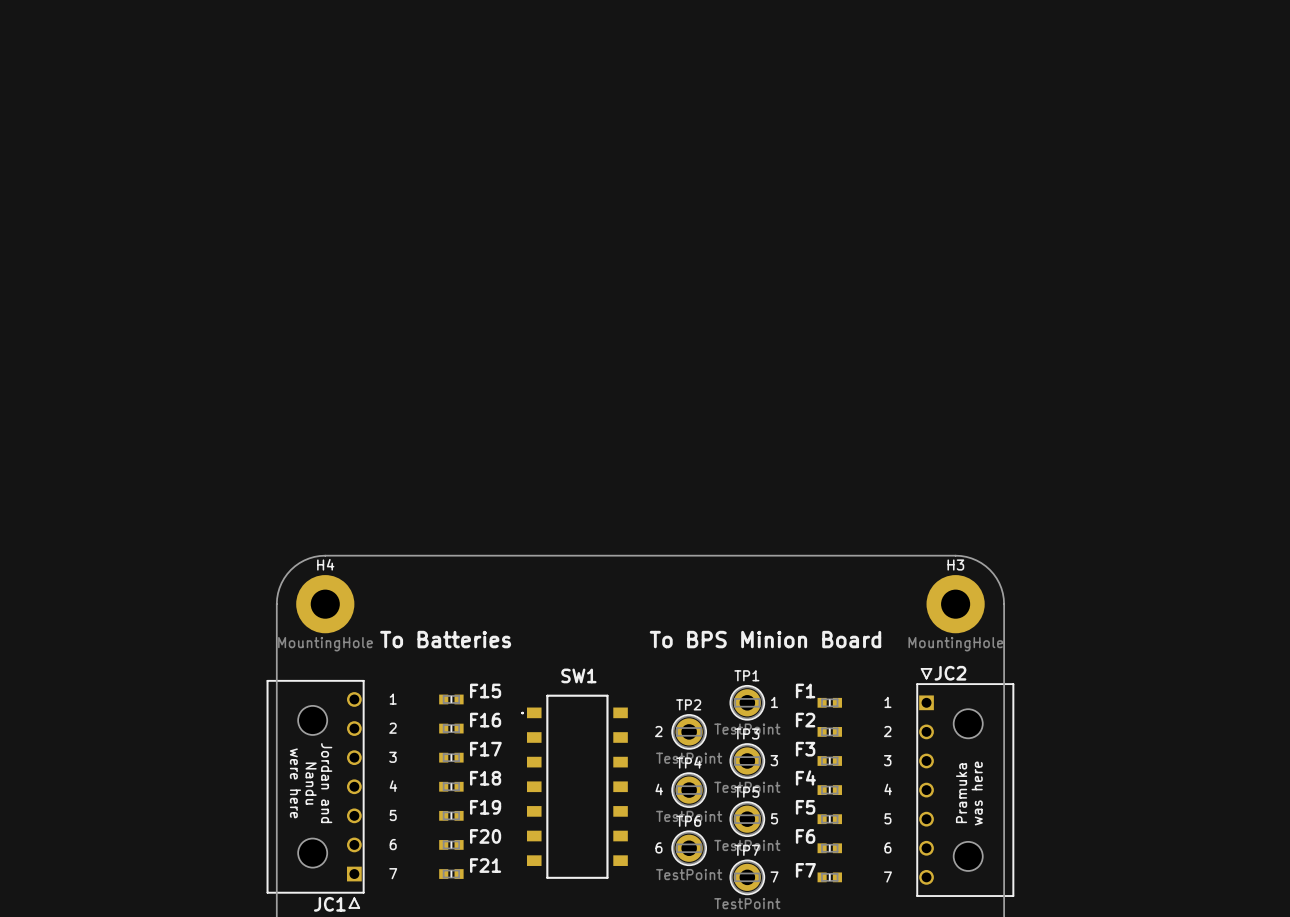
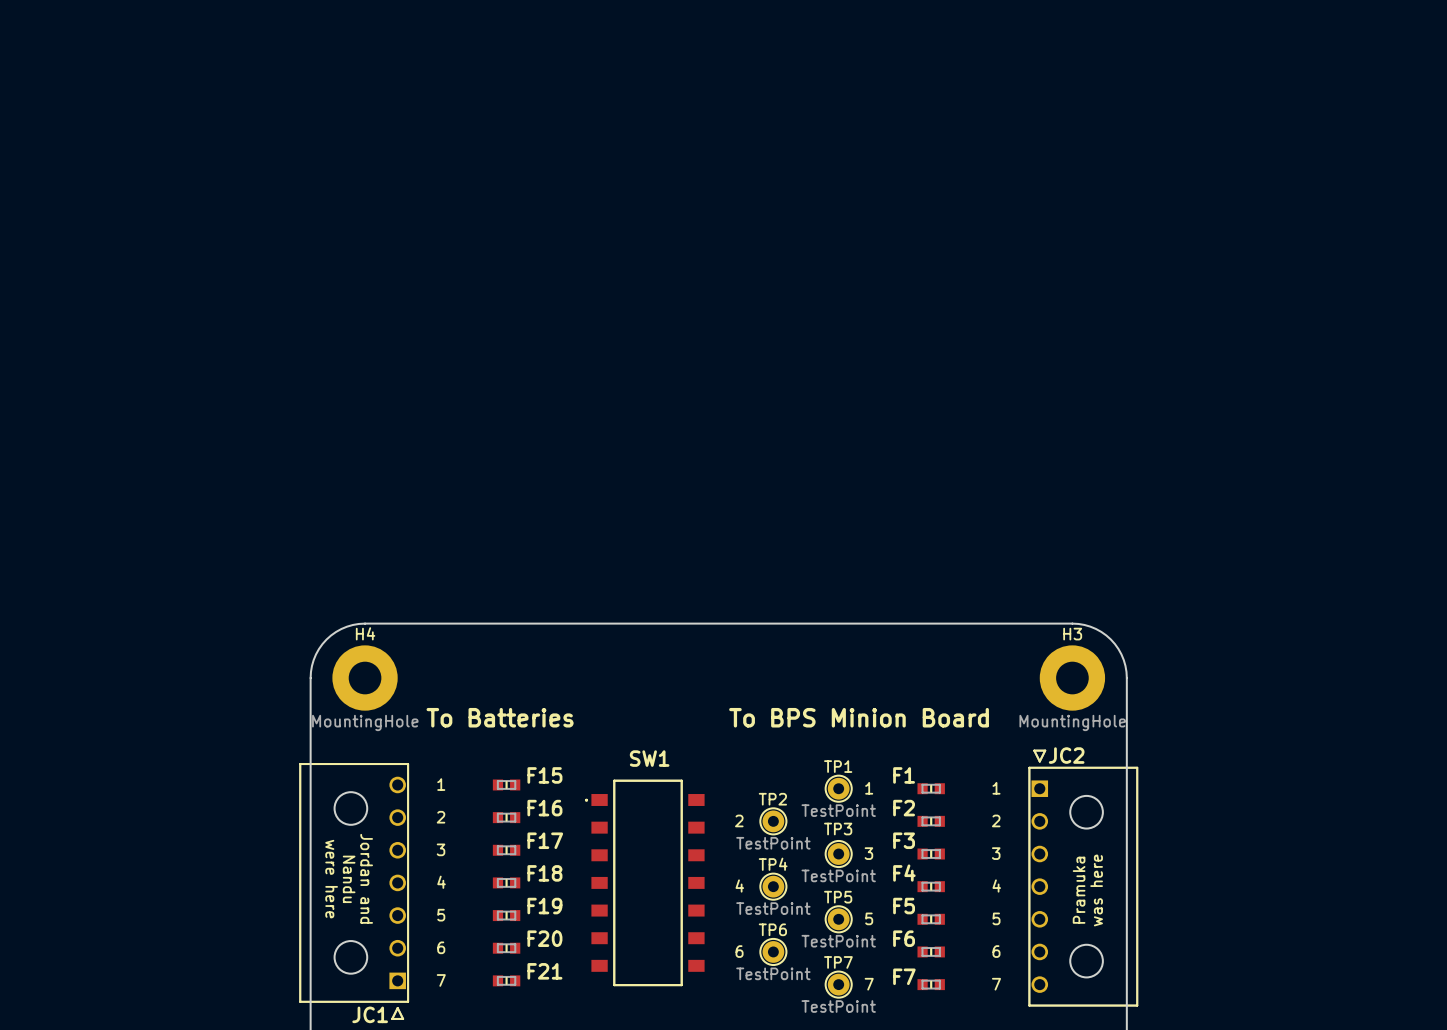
TP1 footprint: [729, 685, 766, 721] -> [824, 775, 853, 803]
TP2 footprint: [671, 714, 707, 750] -> [759, 807, 788, 836]
TP3 footprint: [729, 743, 766, 779] -> [824, 840, 853, 868]
TP4 footprint: [671, 772, 707, 808] -> [759, 872, 788, 901]
TP5 footprint: [729, 801, 766, 837] -> [824, 905, 853, 934]
TP6 footprint: [671, 830, 707, 866] -> [759, 938, 788, 966]
TP7 footprint: [729, 859, 766, 896] -> [824, 970, 853, 999]

